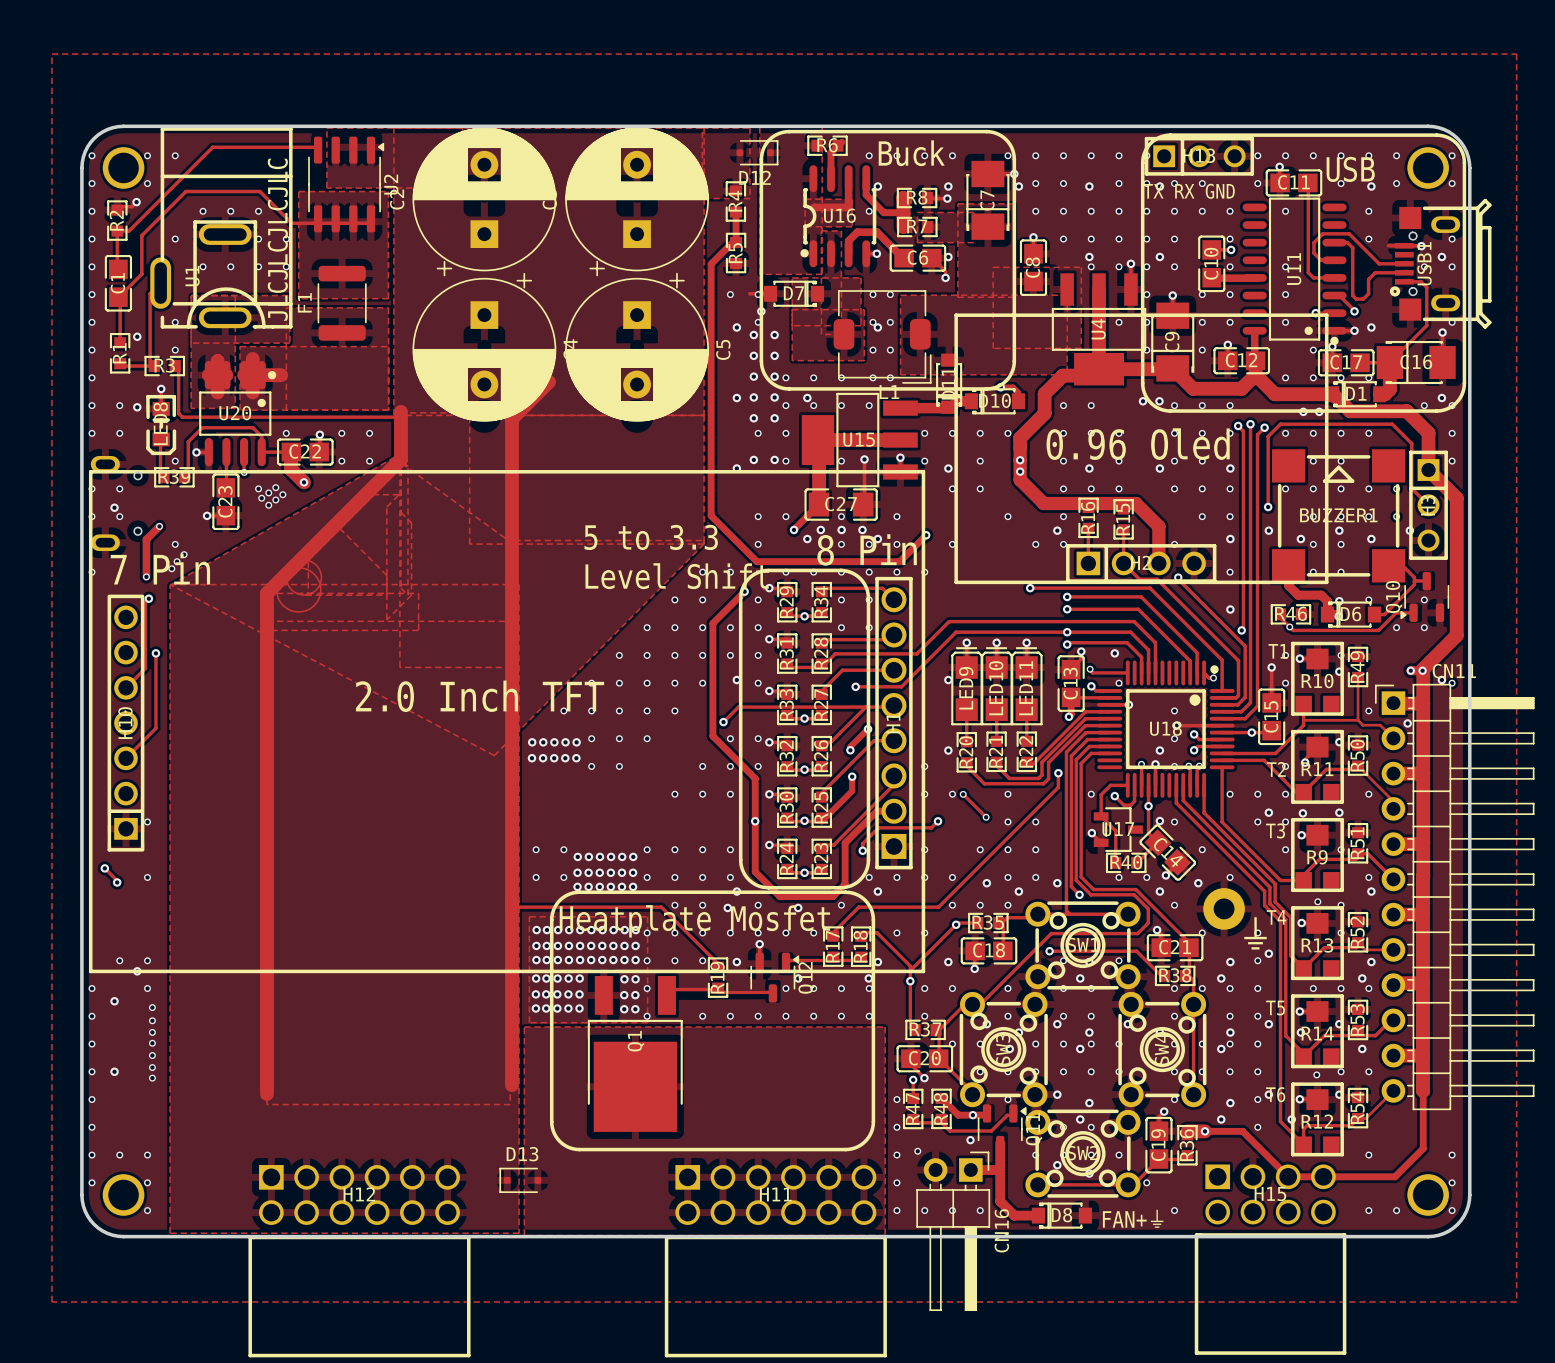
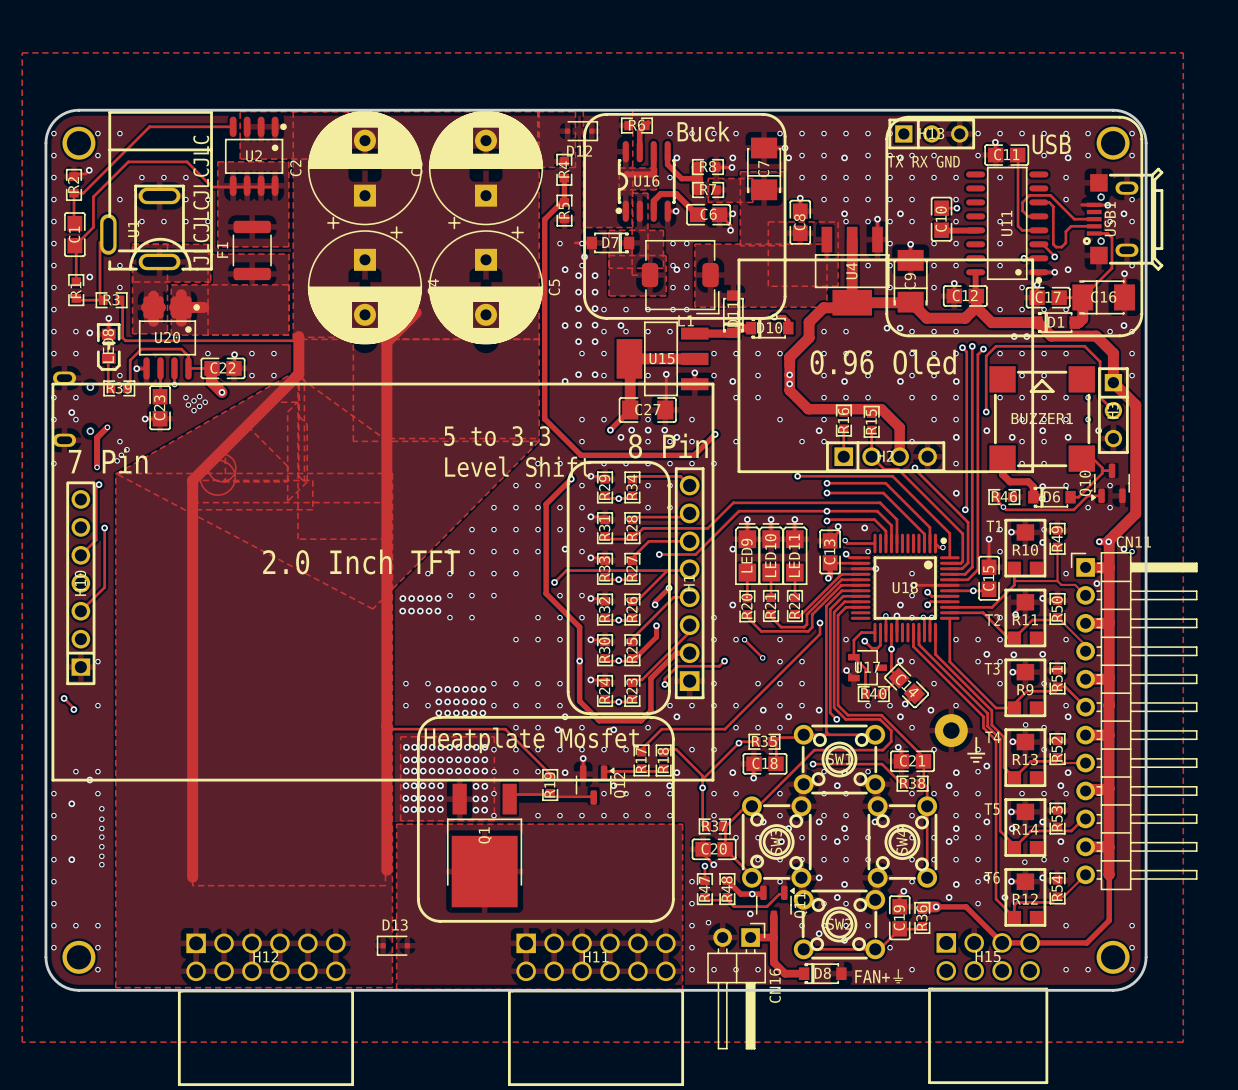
U2 footprint: [308, 136, 385, 233] -> [224, 116, 287, 197]
U2 name position: U2 (391, 184) -> U2 (254, 155)

